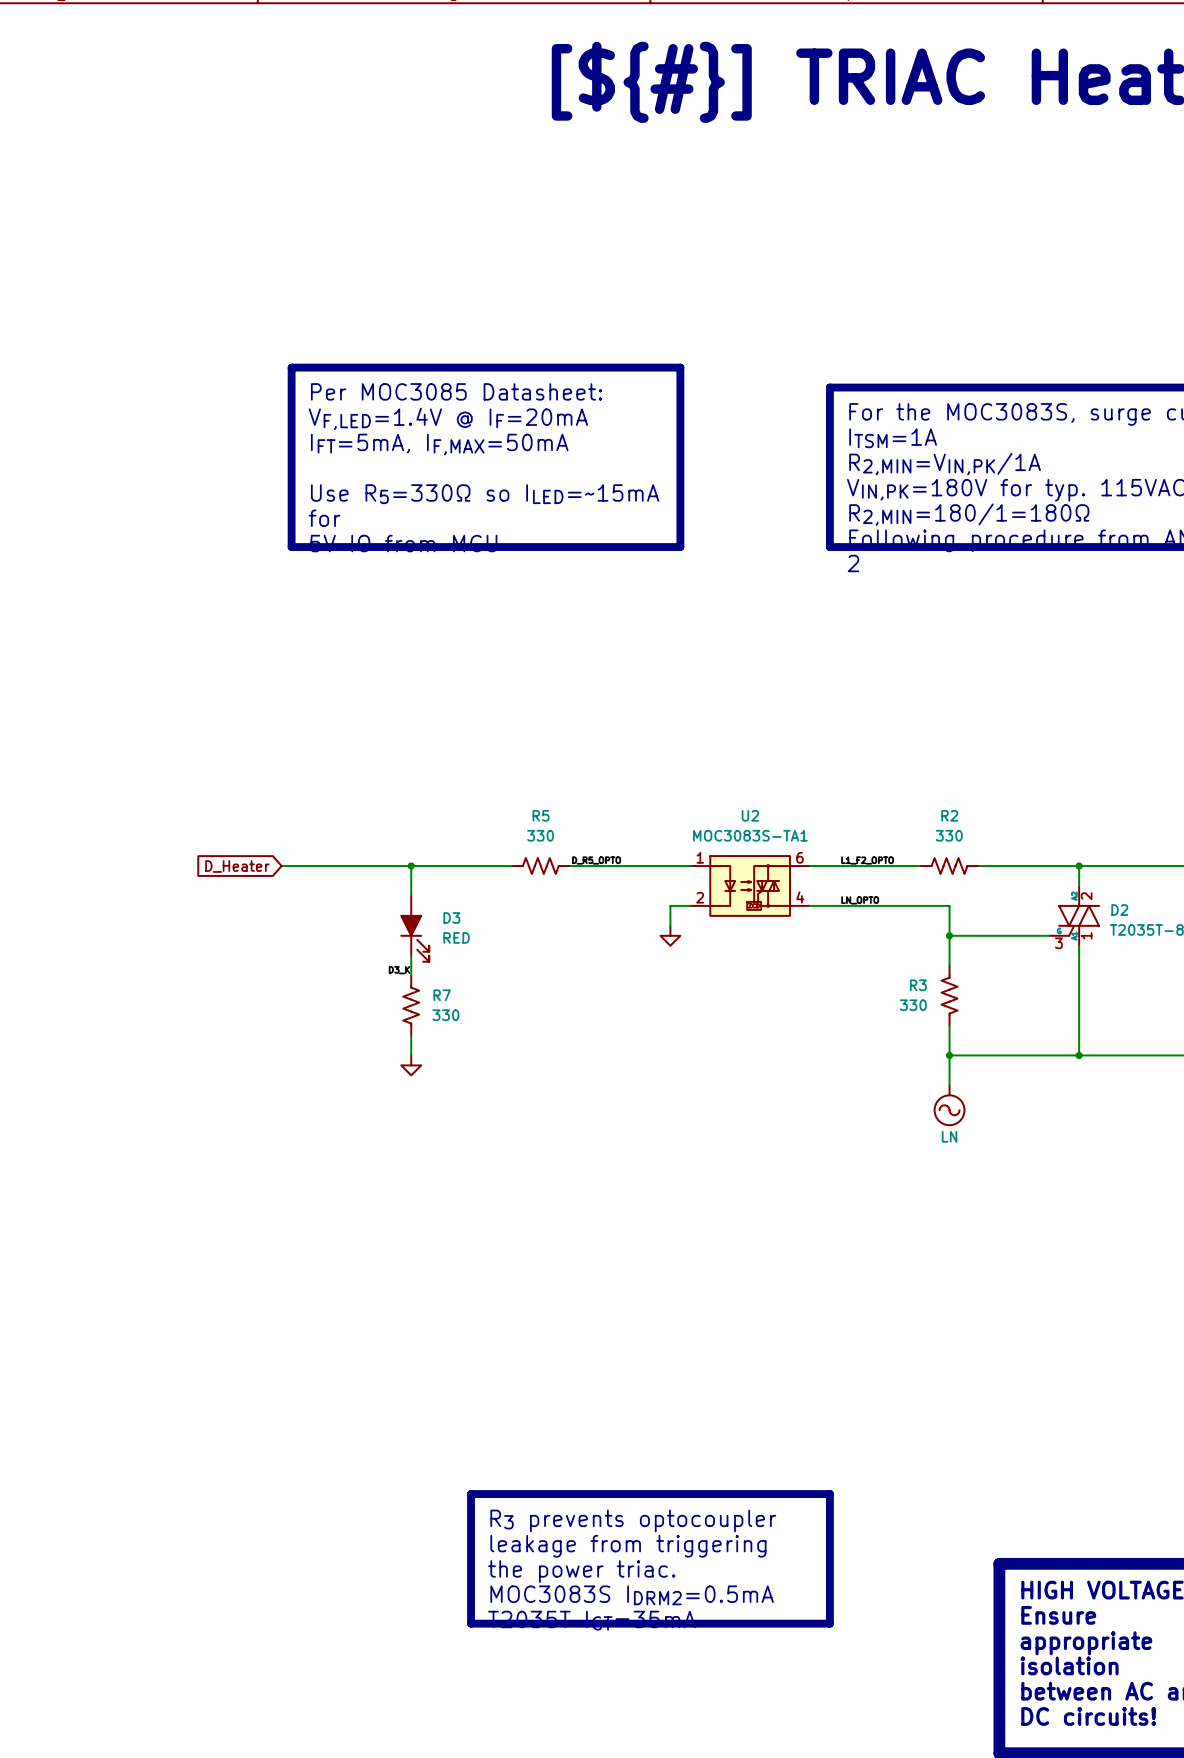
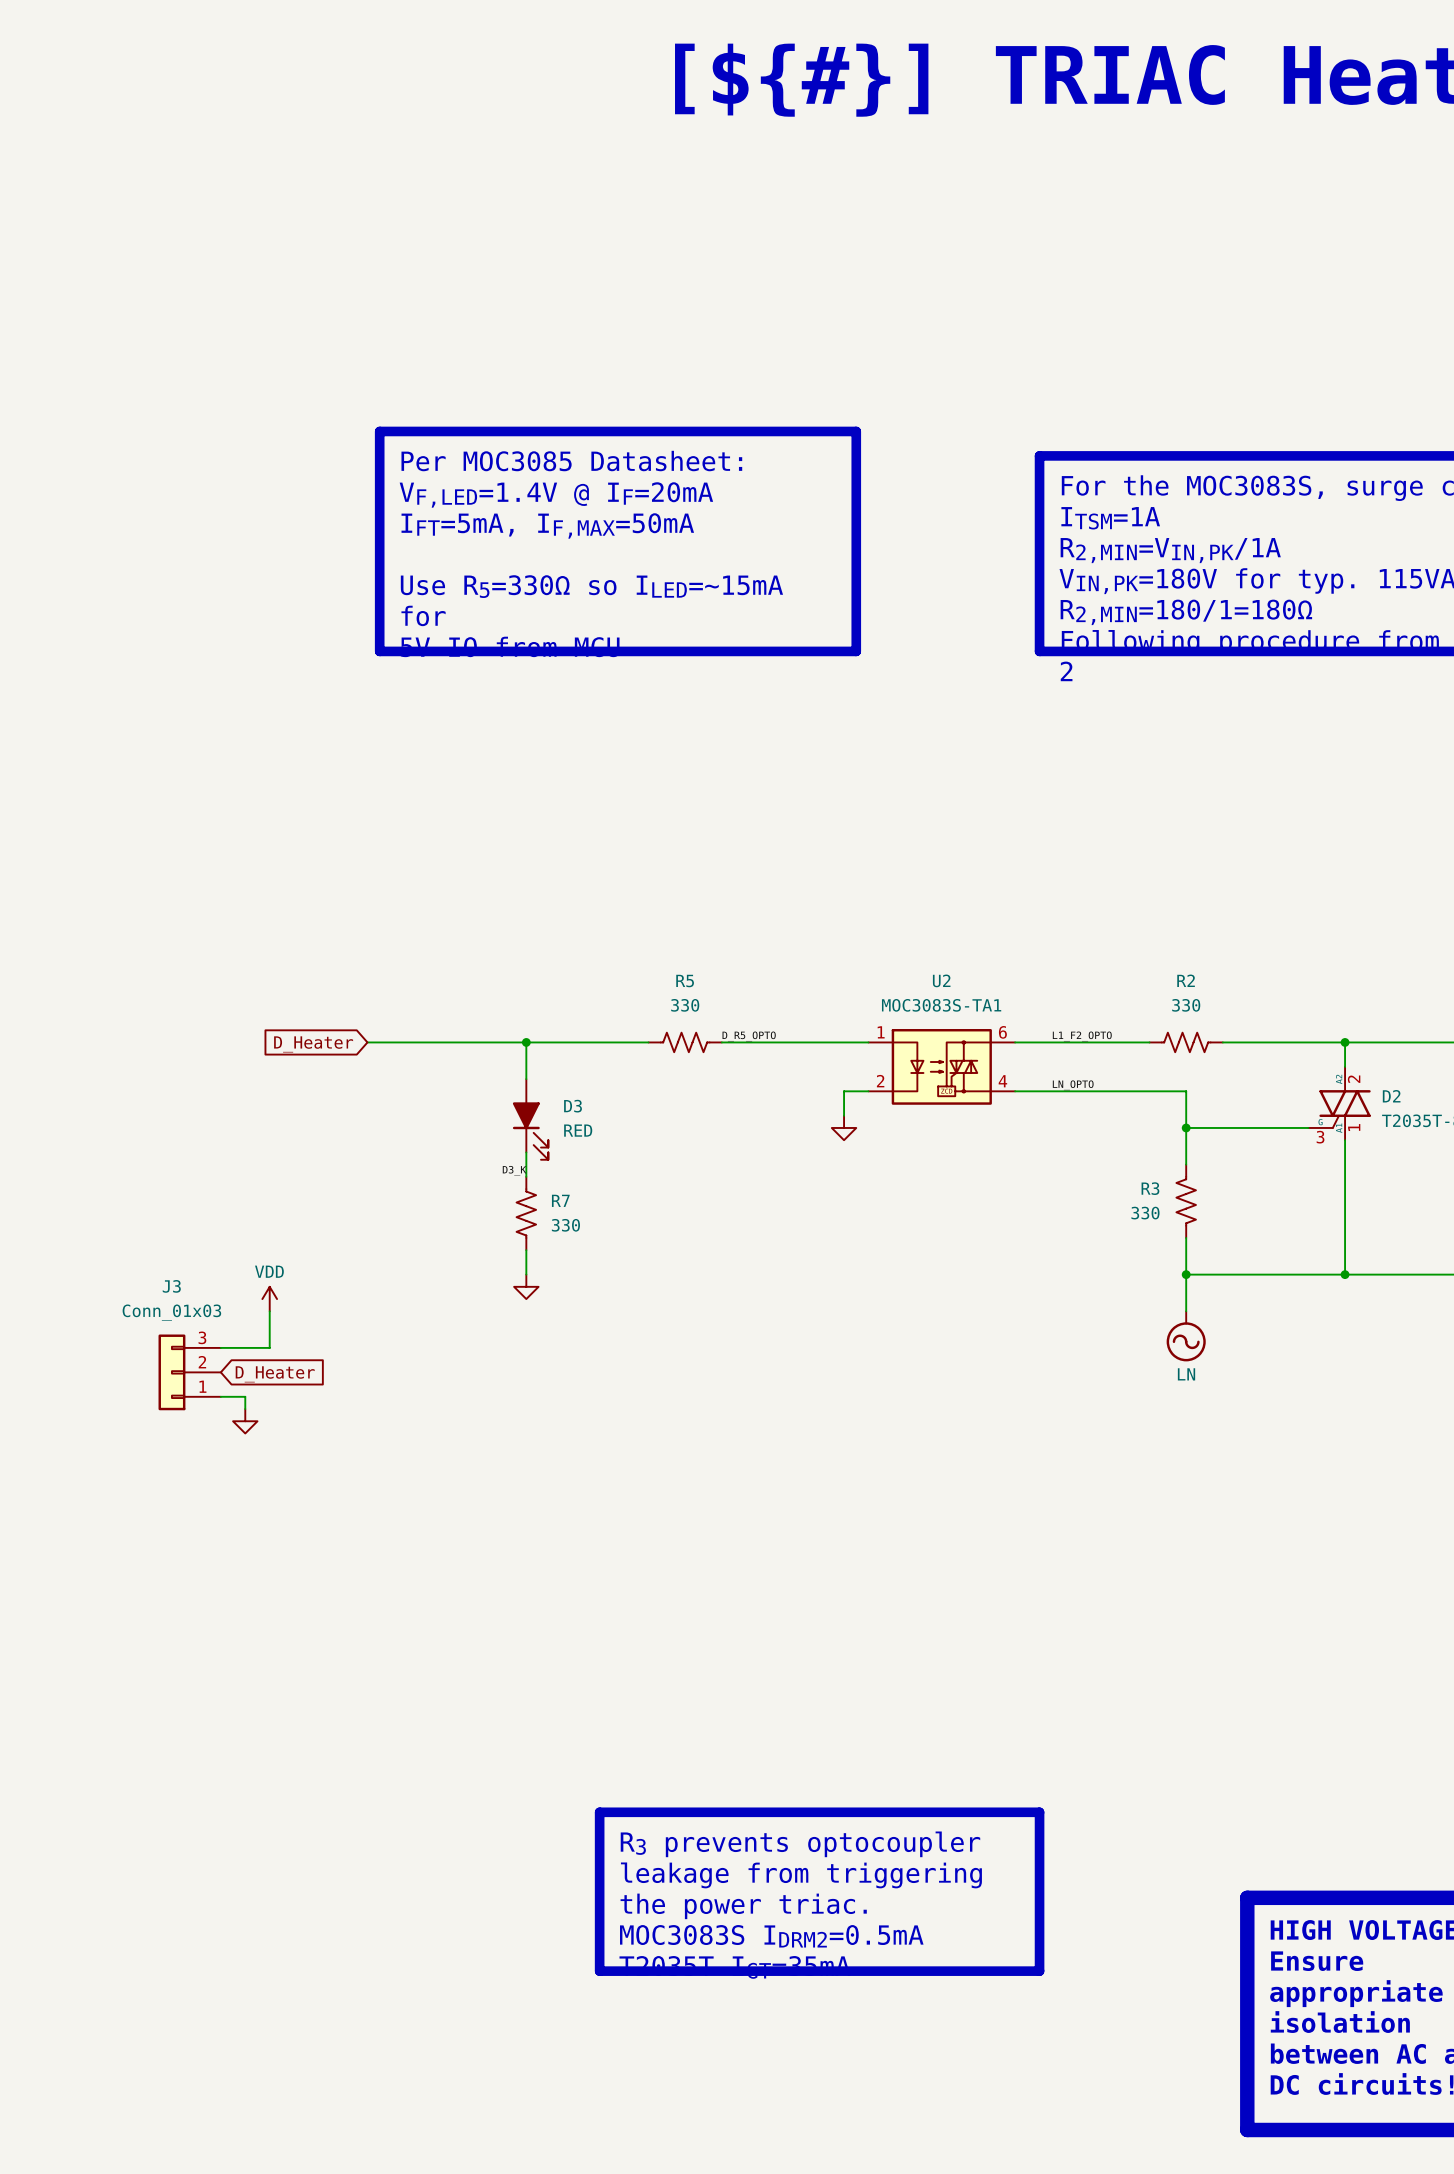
power symbol: none -> VDD (269, 1299)
wire: none -> (269, 1311) (269, 1347) (220, 1347)
J3: none -> Conn_01x03 (189, 1372)
global label: none -> D_Heater (275, 1374)
wire: none -> (220, 1396) (245, 1396) (245, 1409)
power symbol: none -> (245, 1421)

